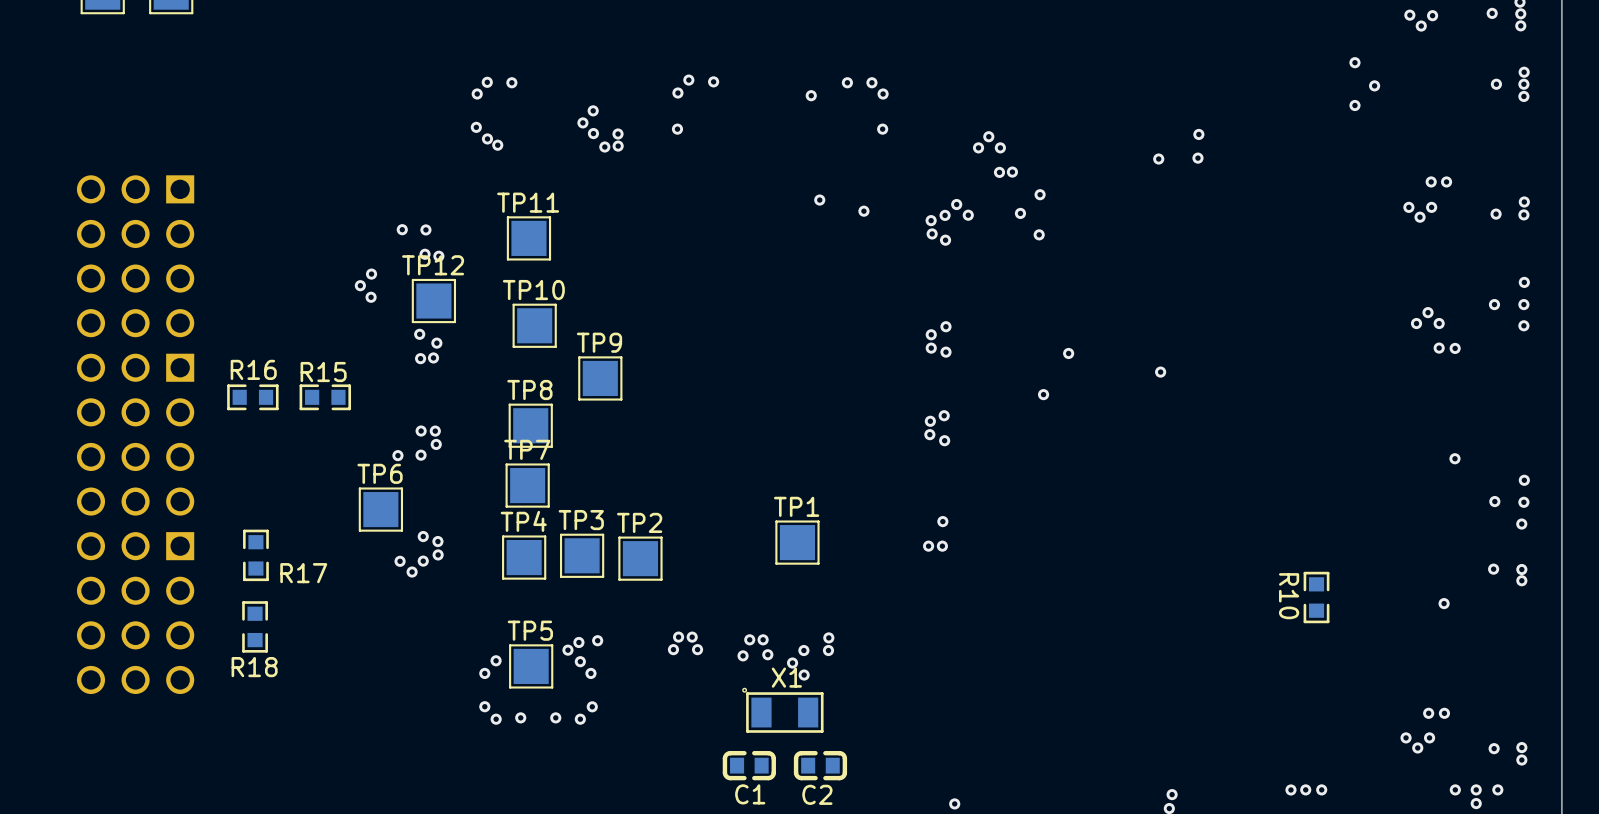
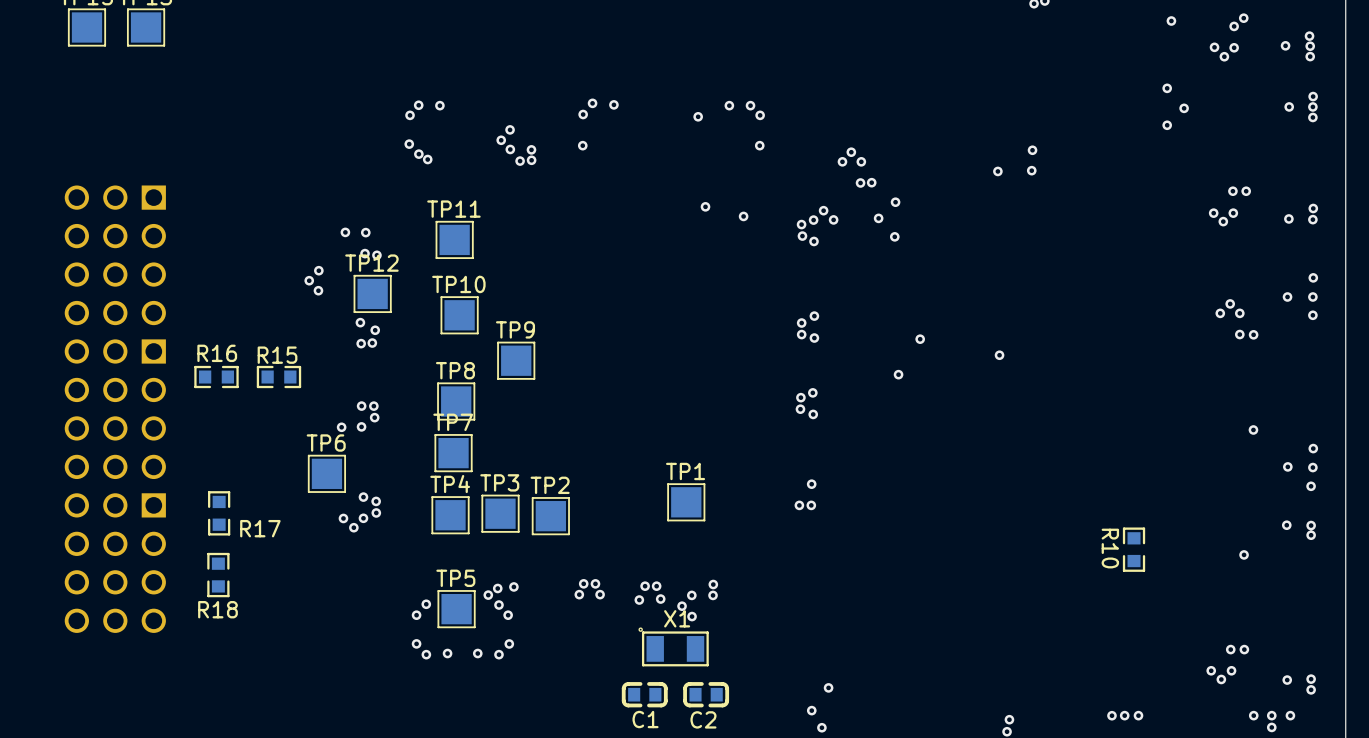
via: none -> (828, 687)
via: none -> (811, 710)

